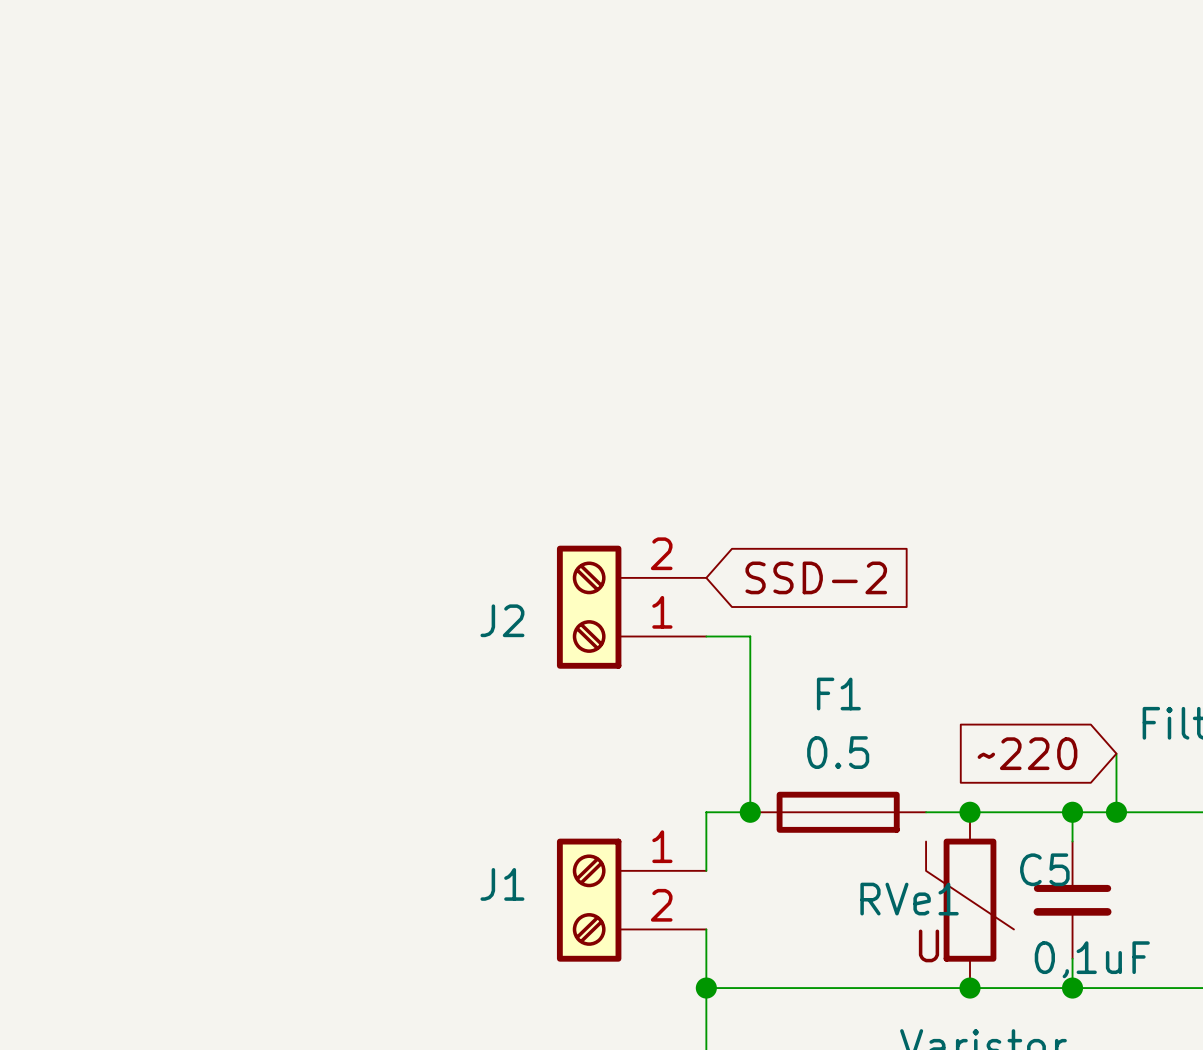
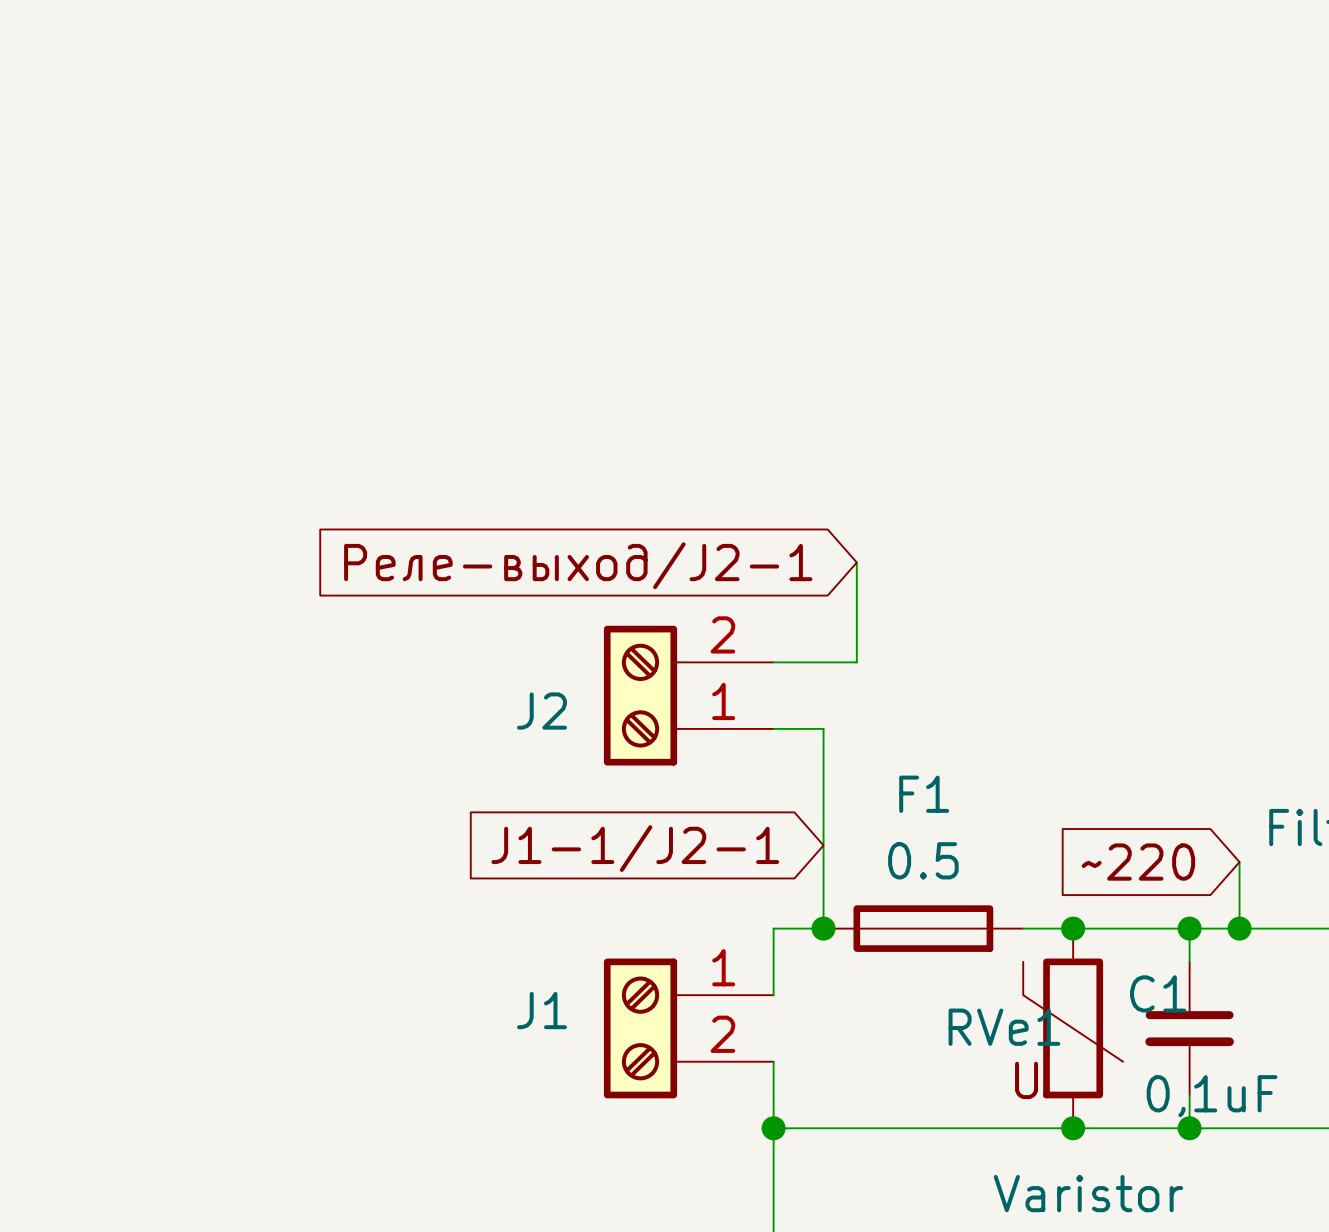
wire: none -> (856, 562) (856, 662) (773, 662)
global label: none -> Реле-выход/J2-1 (578, 565)
global label: SSD-2 (816, 577) -> none
global label: none -> J1-1/J2-1 (635, 848)
C5 name: C5 (1044, 869) -> C1 (1158, 993)

